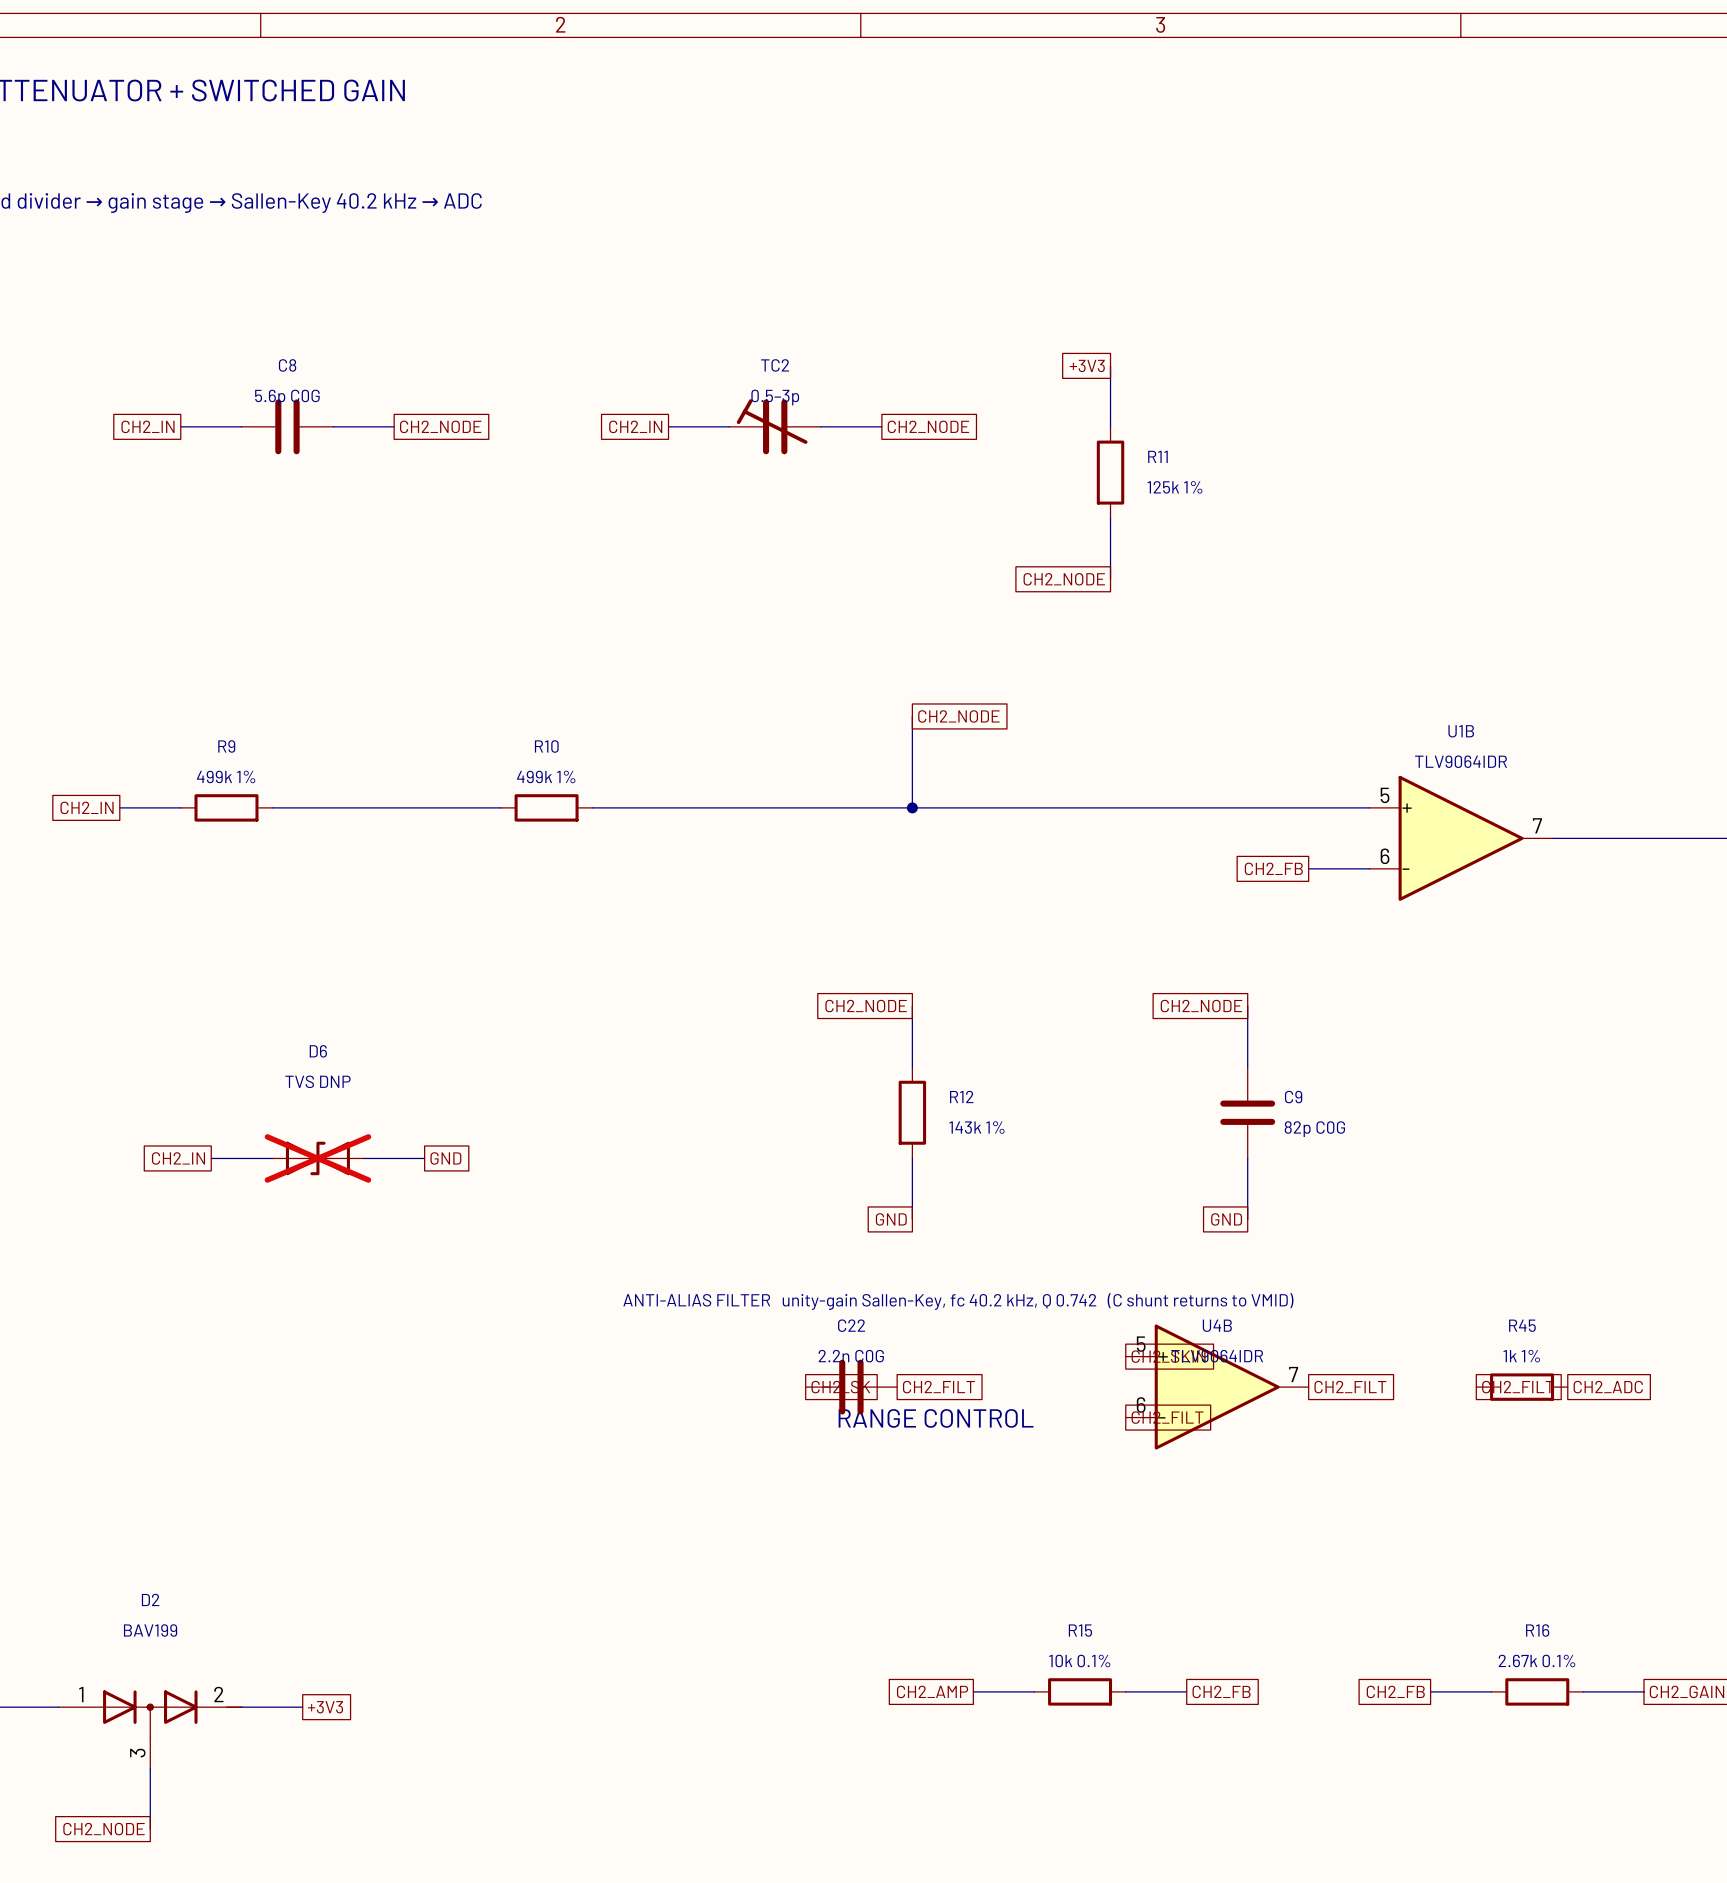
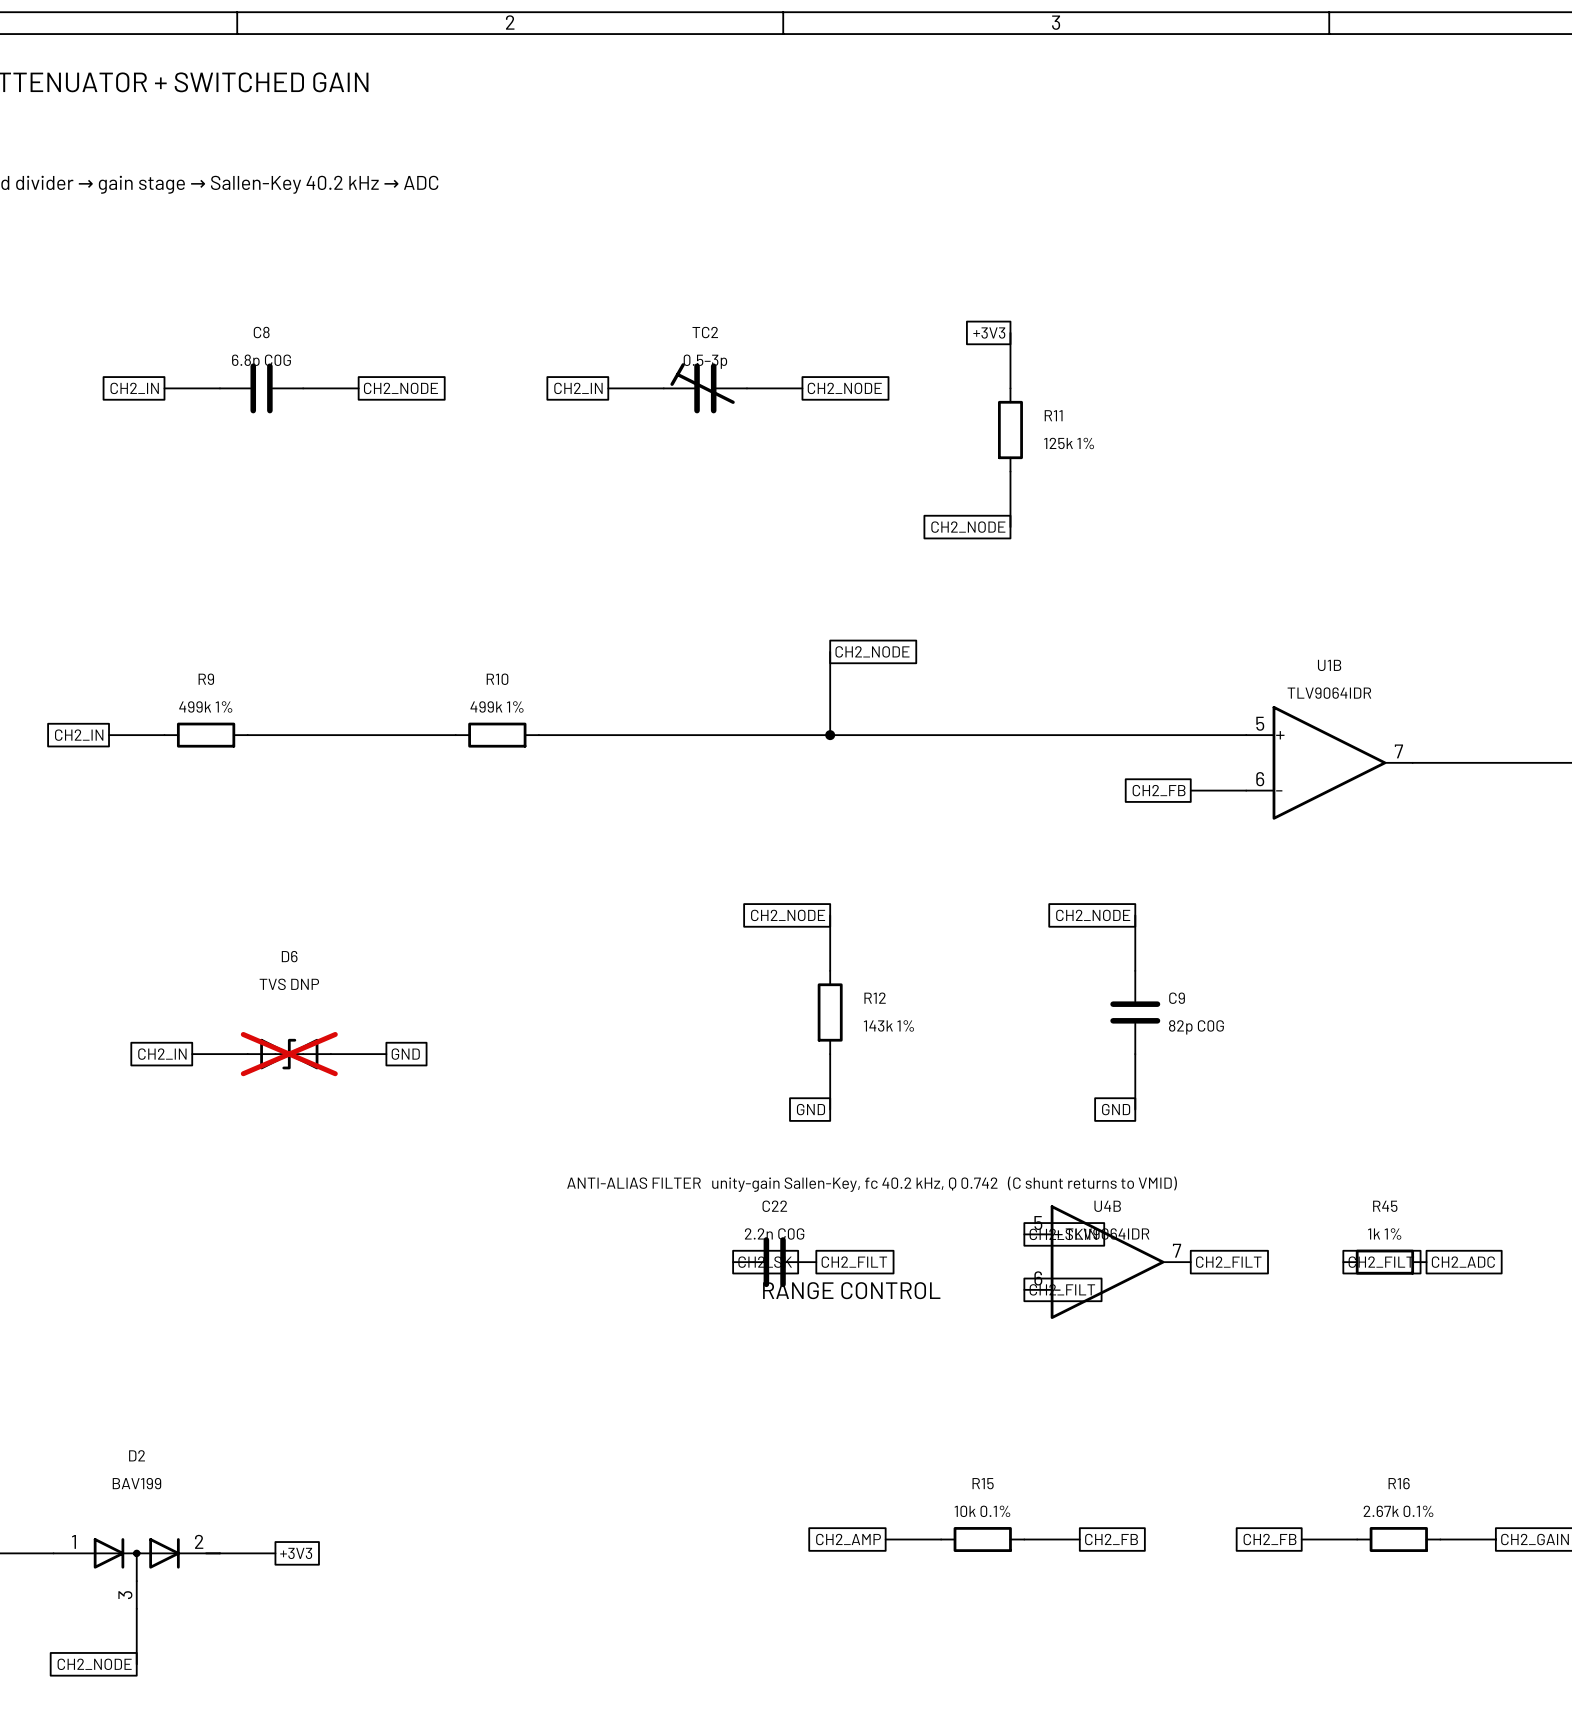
C8 value: 5.6p C0G (287, 397) -> 6.8p C0G (261, 361)

